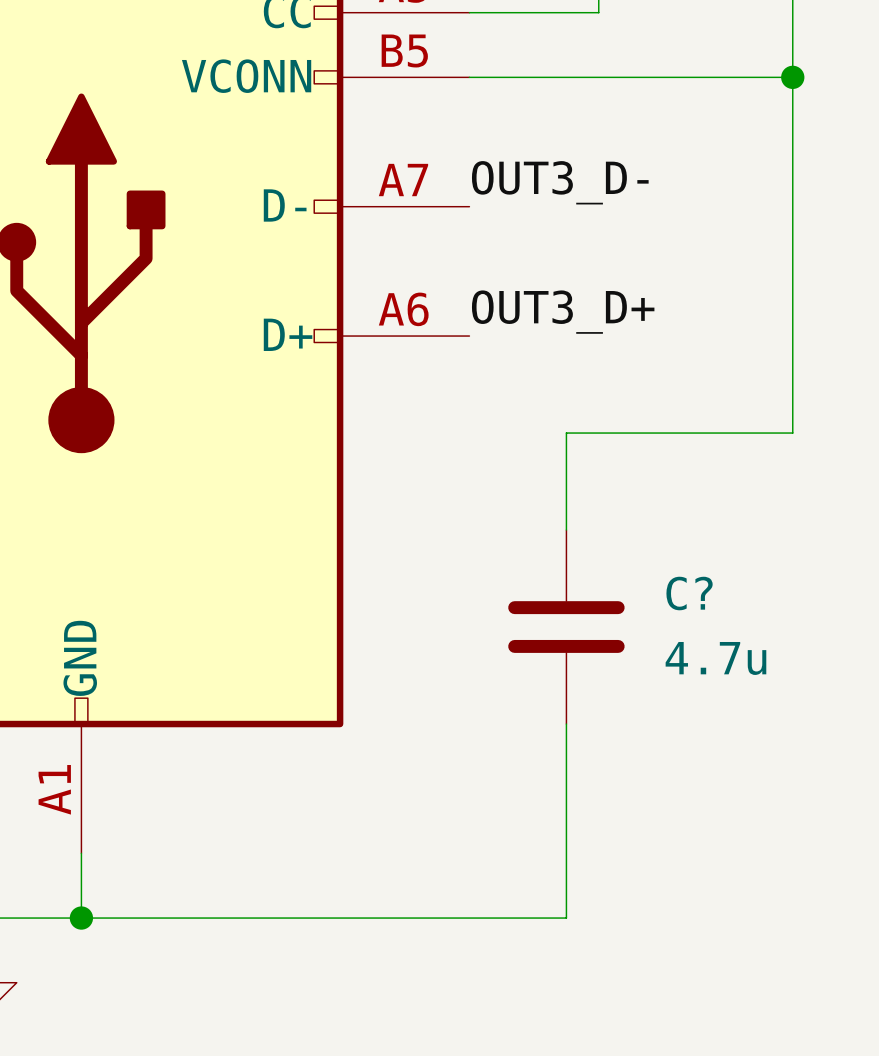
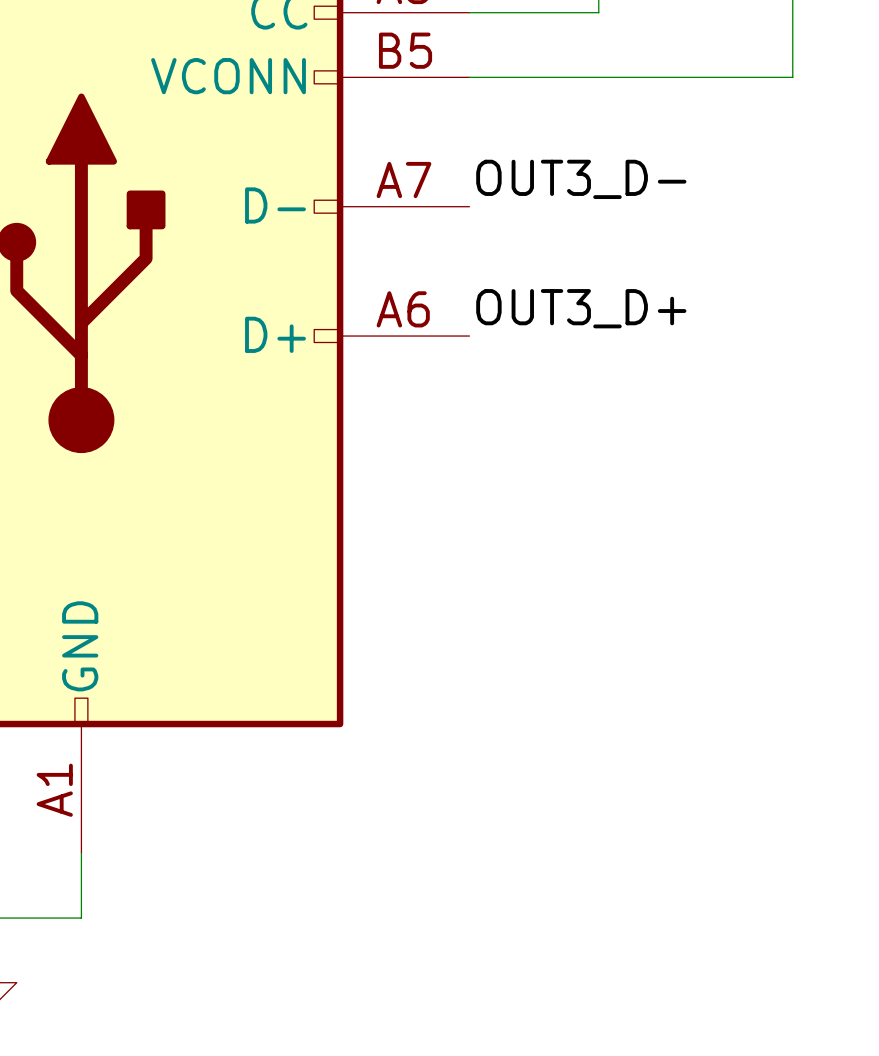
wire: (792, 77) (792, 433) (566, 433) (566, 530) -> none
junction: (792, 77) -> none
C?: 4.7u (566, 627) -> none
wire: (566, 724) (566, 918) (81, 918) -> none
junction: (81, 918) -> none

